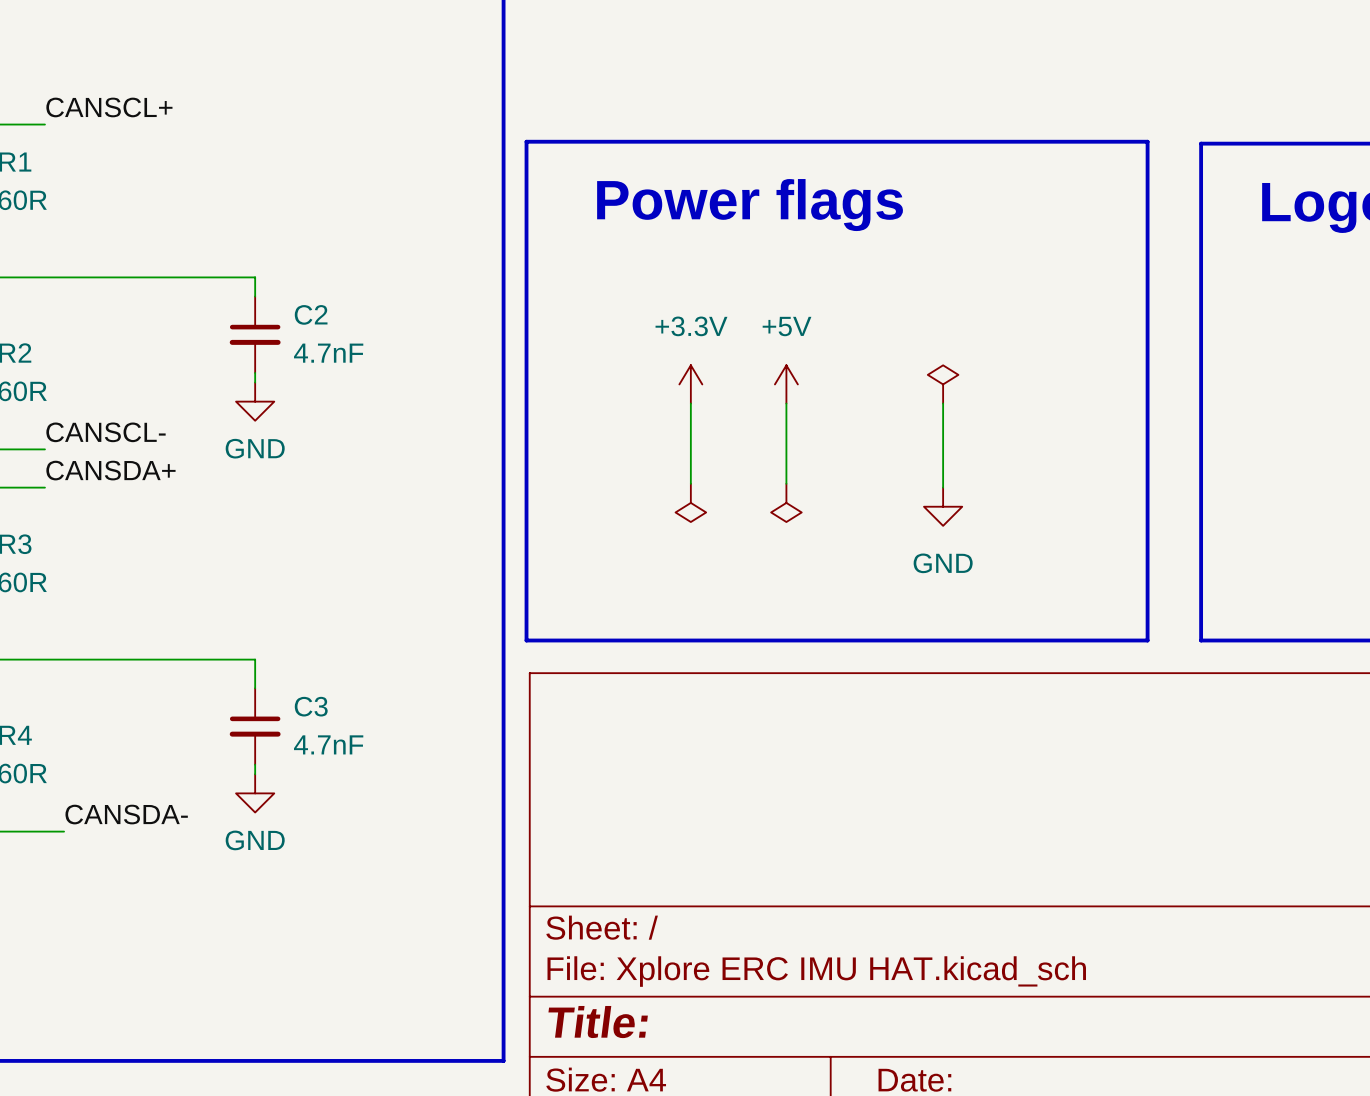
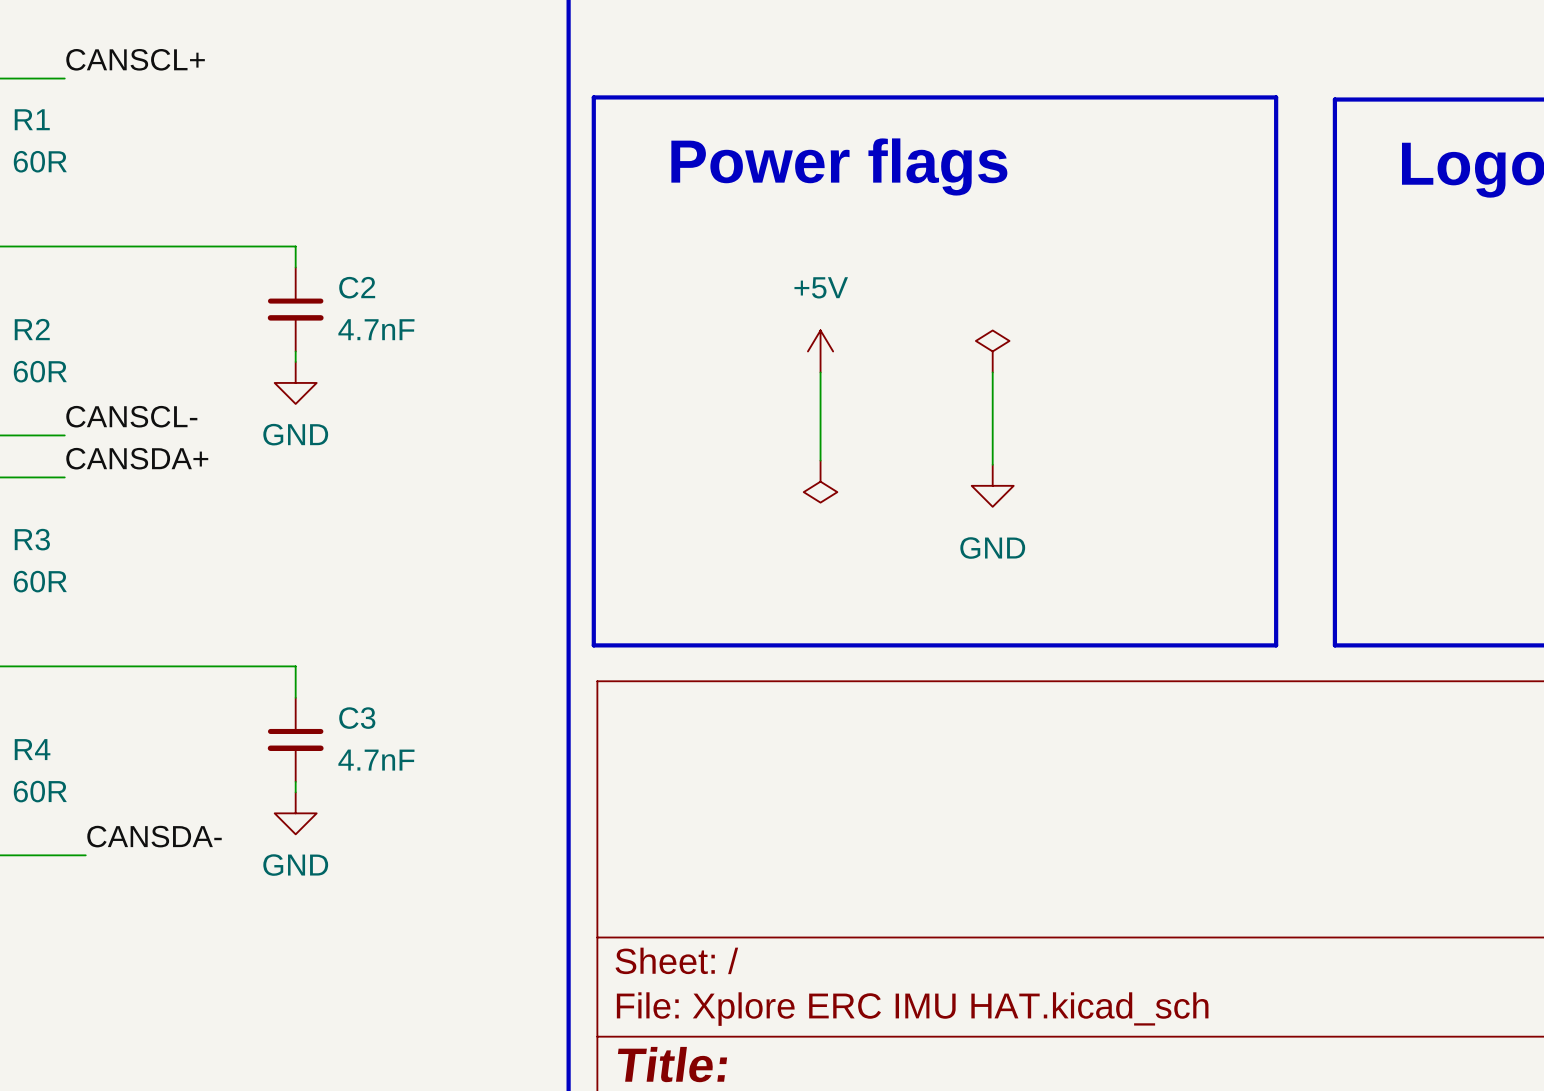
power symbol: +3.3V (690, 384) -> none
power symbol position: +5V (786, 384) -> +5V (820, 351)
power symbol position: (943, 384) -> (992, 351)
wire: (690, 403) (690, 483) -> (820, 372) (820, 460)
wire: (786, 403) (786, 483) -> none
wire: (943, 403) (943, 487) -> (992, 372) (992, 464)
power symbol: none -> (820, 481)
power symbol: (690, 502) -> none
power symbol: (786, 502) -> none
power symbol position: GND (943, 506) -> GND (992, 485)

